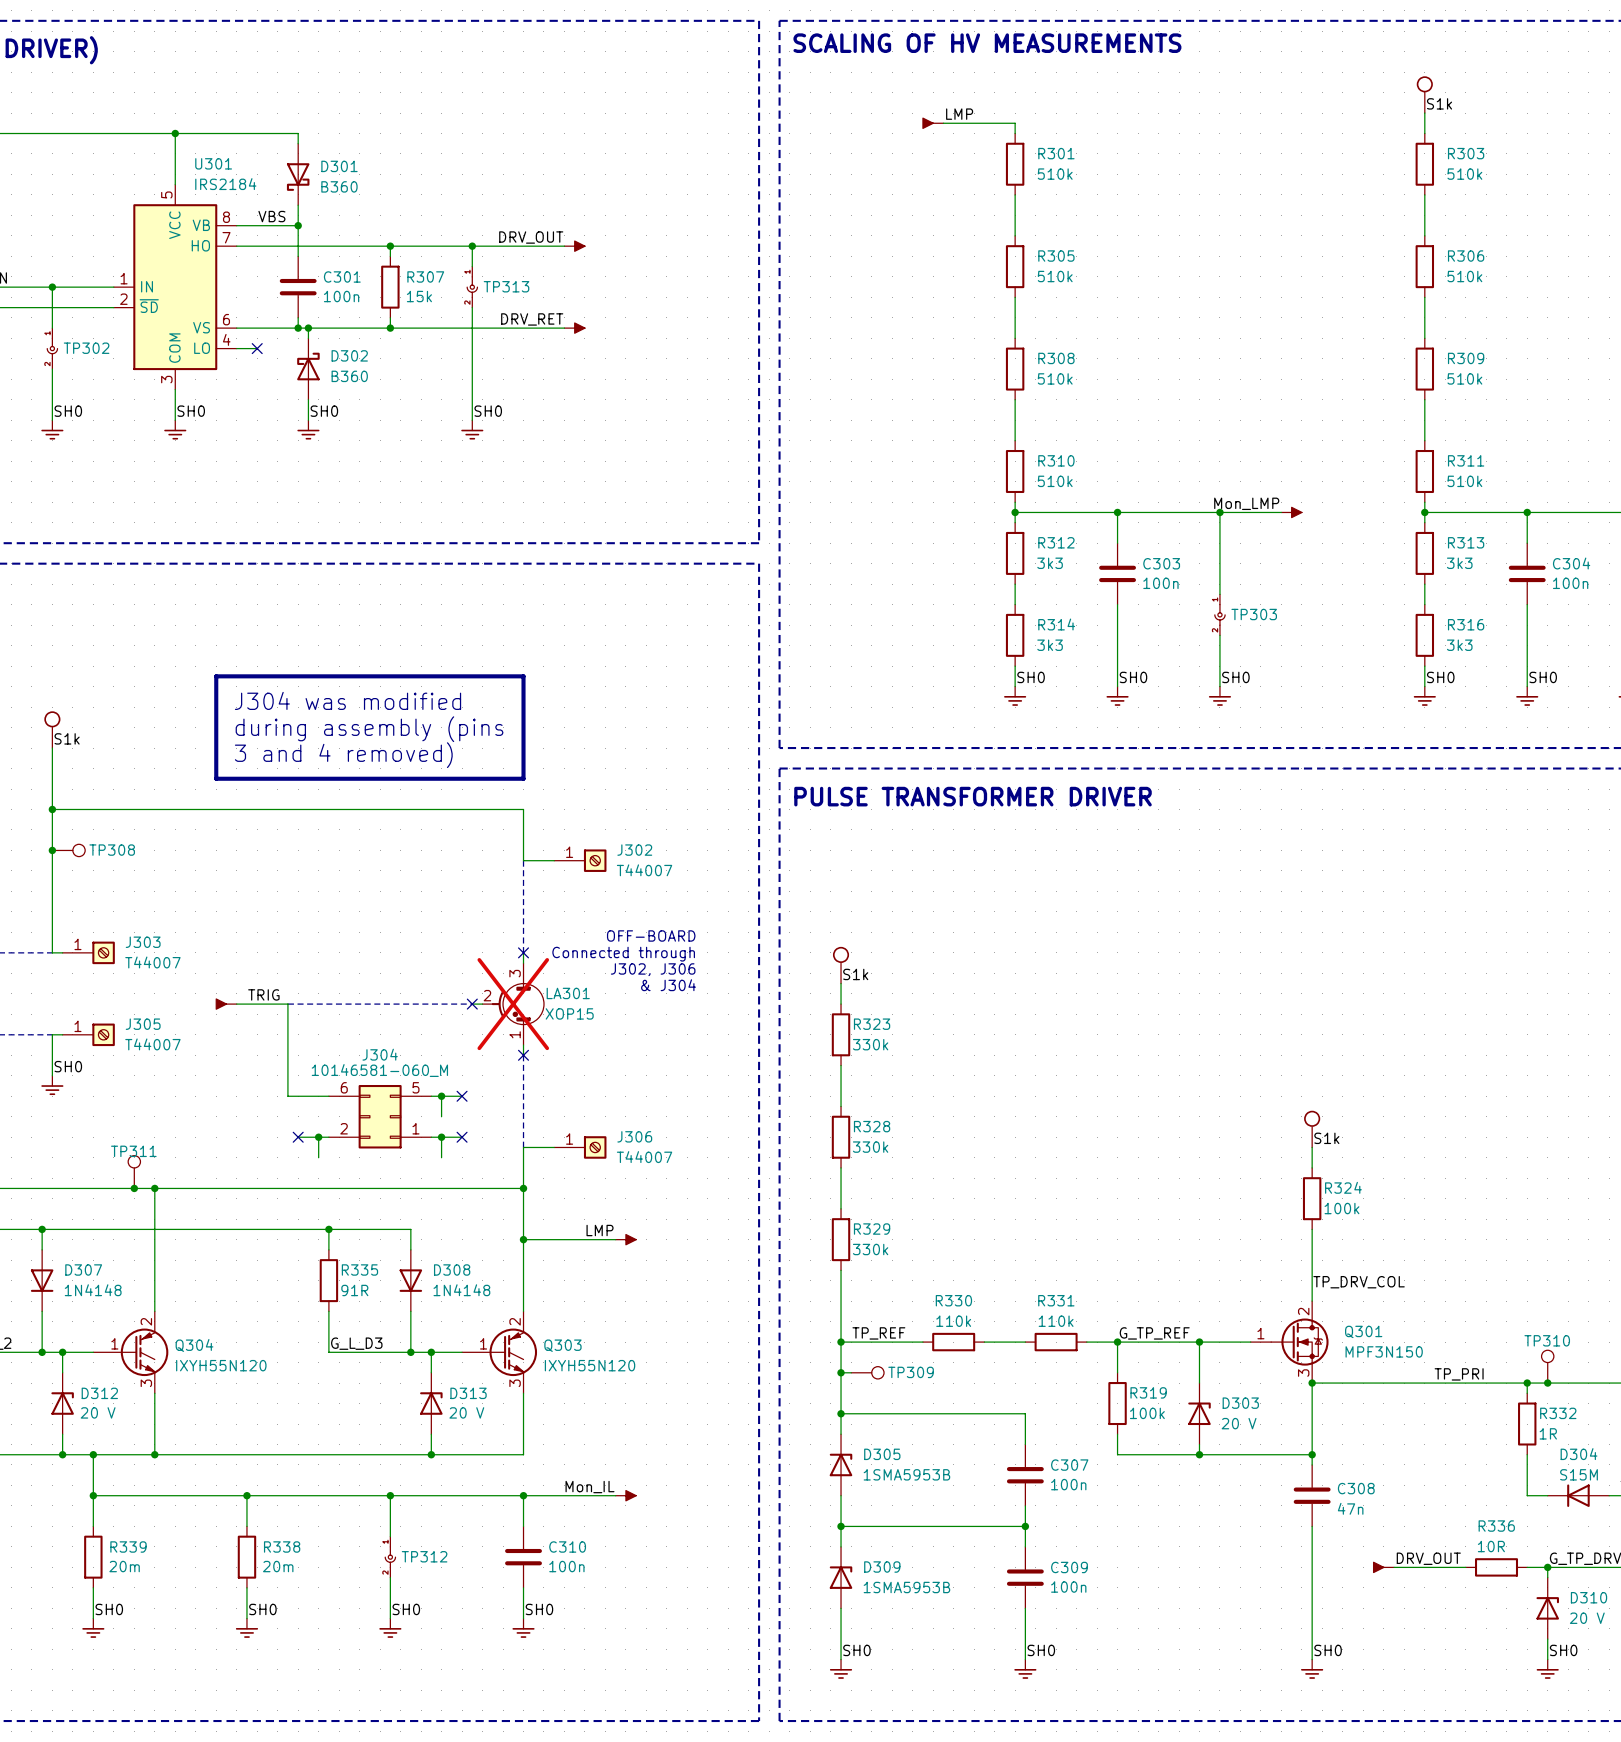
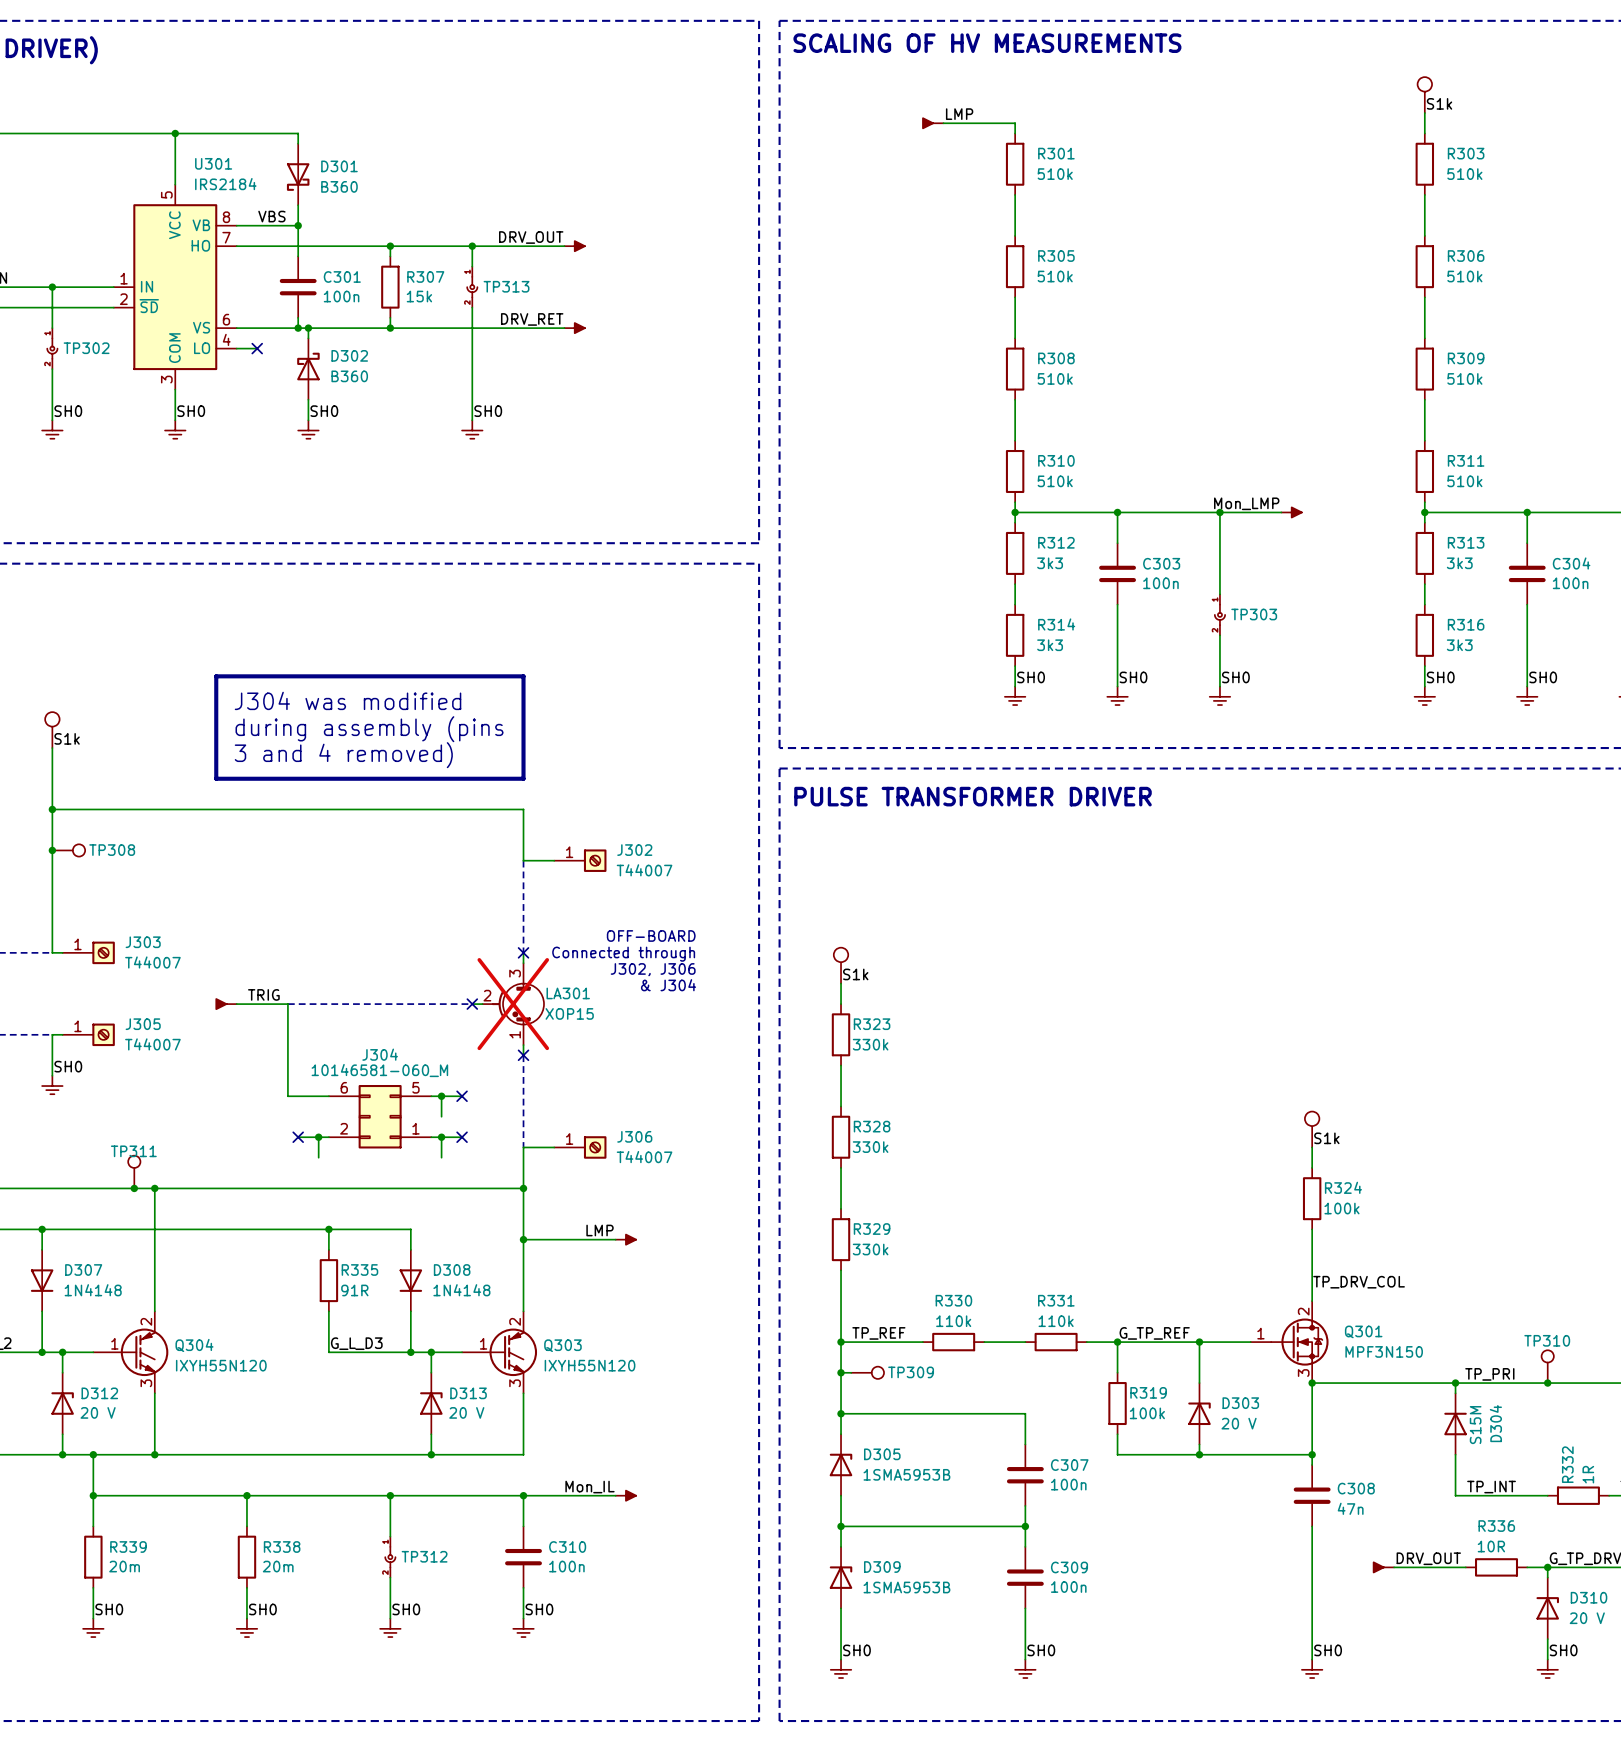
label position: TP_PRI (1459, 1374) -> TP_PRI (1489, 1374)
junction: none -> (1455, 1383)
wire: (1527, 1383) (1527, 1393) -> (1455, 1383) (1455, 1393)
junction: (1527, 1383) -> none
R332 name position: R332 (1558, 1413) -> R332 (1567, 1464)
R332 rotation: 0° (1527, 1424) -> 90° clockwise (1578, 1495)
R332 position: (1527, 1424) -> (1578, 1495)
R332 value position: 1R (1548, 1433) -> 1R (1588, 1474)
wire: (1527, 1454) (1527, 1495) -> (1455, 1454) (1455, 1495) (1527, 1495)
label: none -> TP_INT (1491, 1487)
D304 rotation: 0° (1578, 1495) -> 90° clockwise (1455, 1424)
D304 position: (1578, 1495) -> (1455, 1424)

